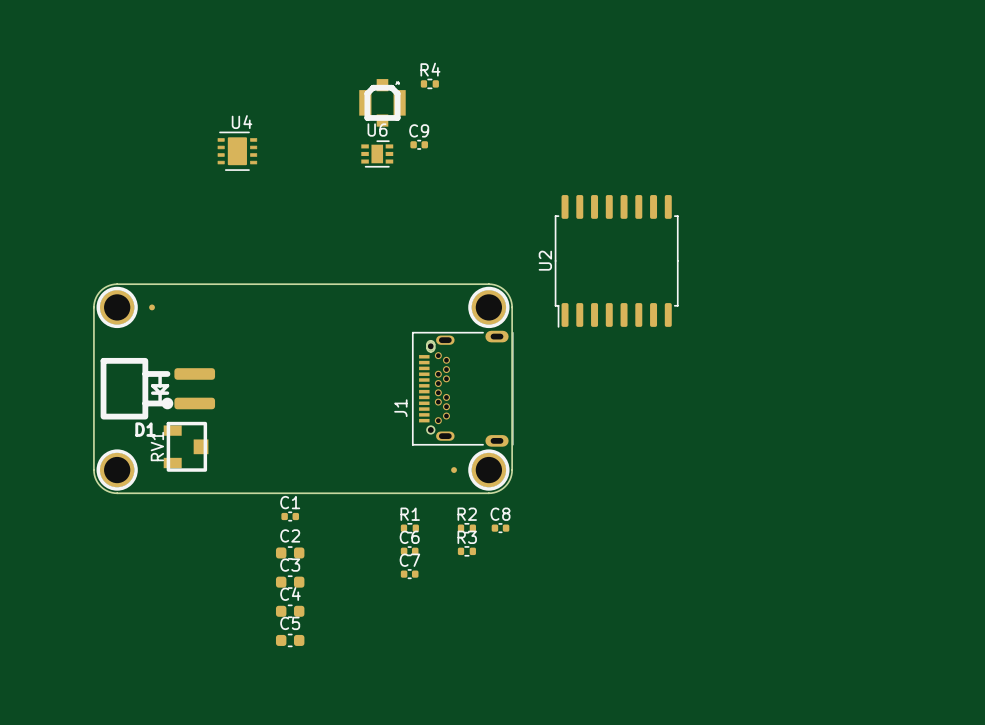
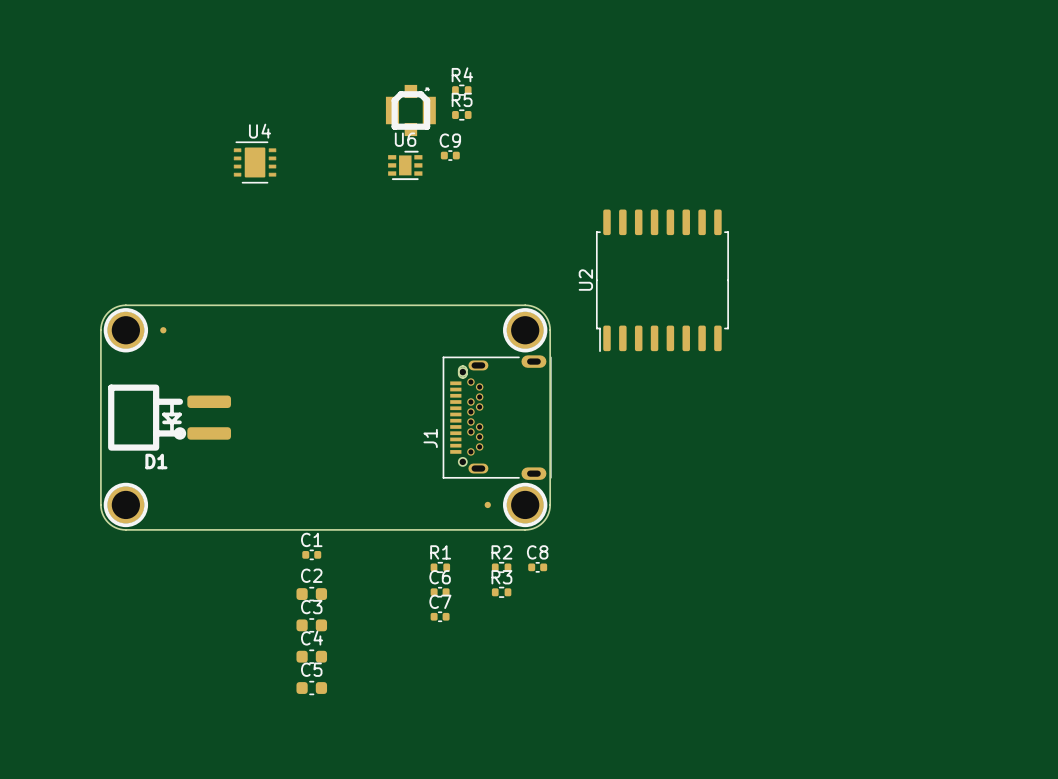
R5: none -> (461, 114)
RV1: (186, 446) -> none

